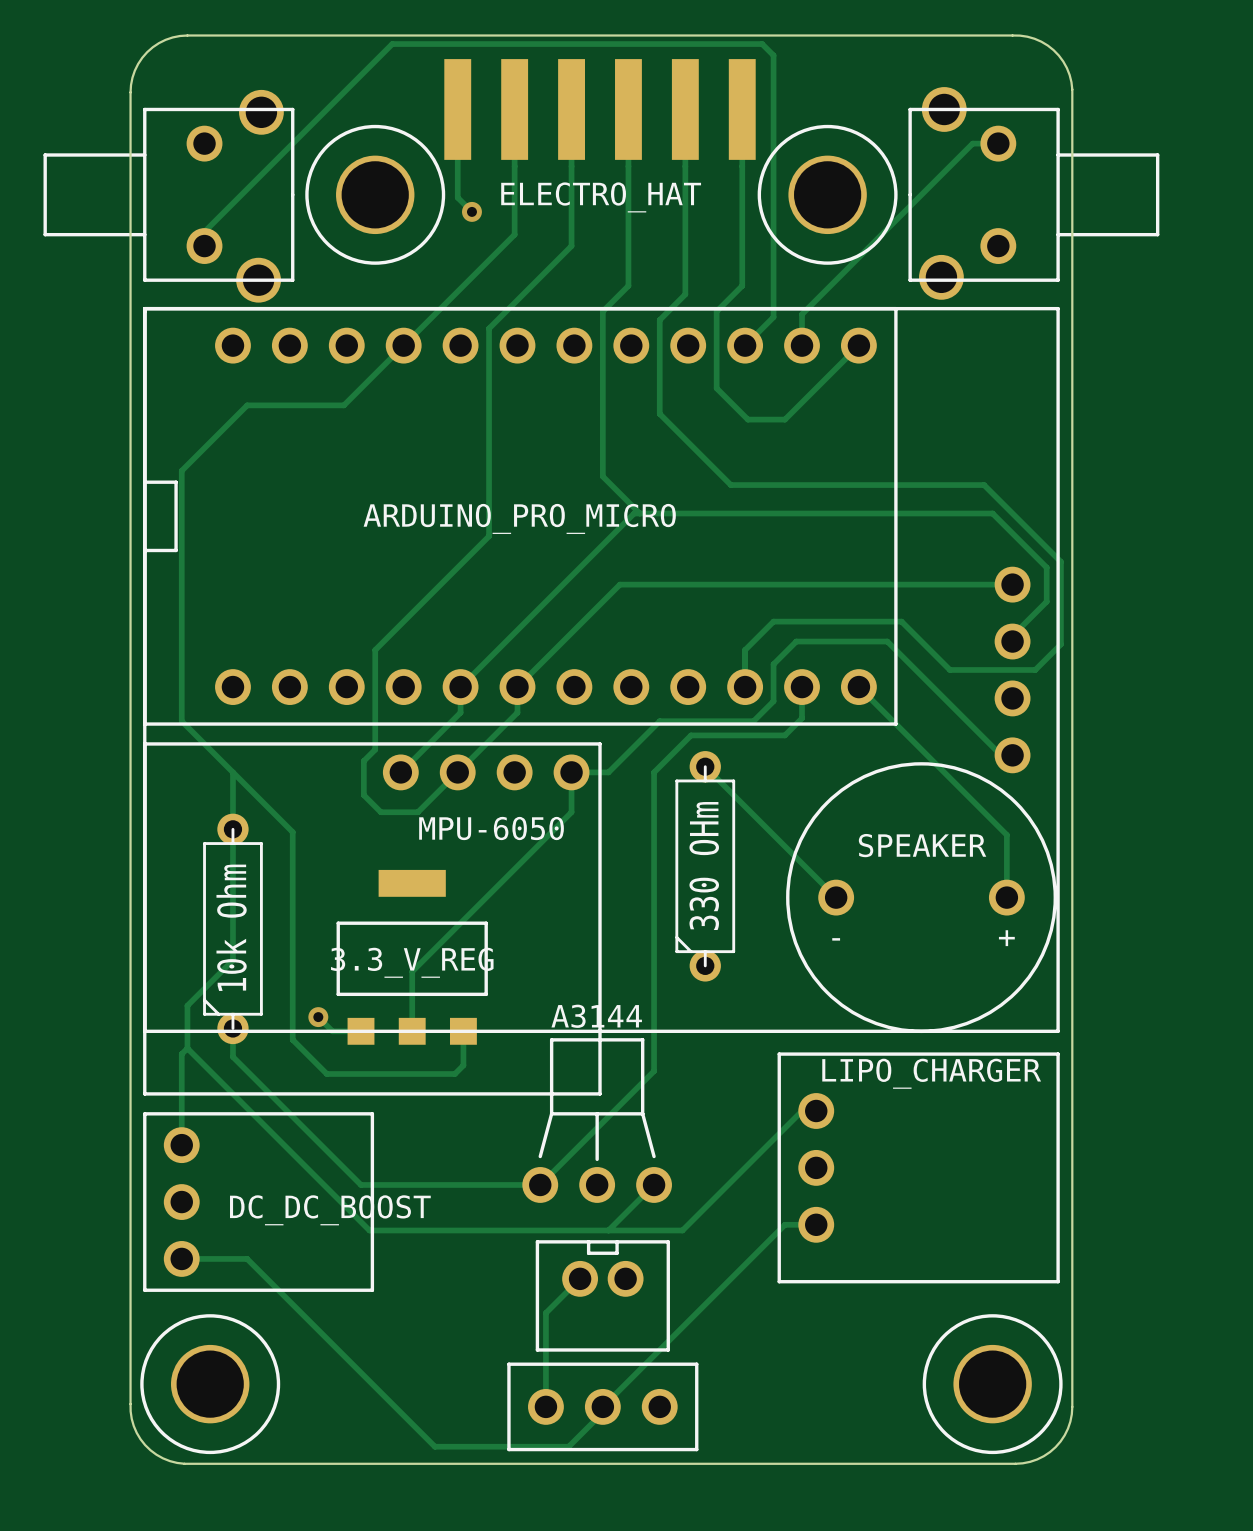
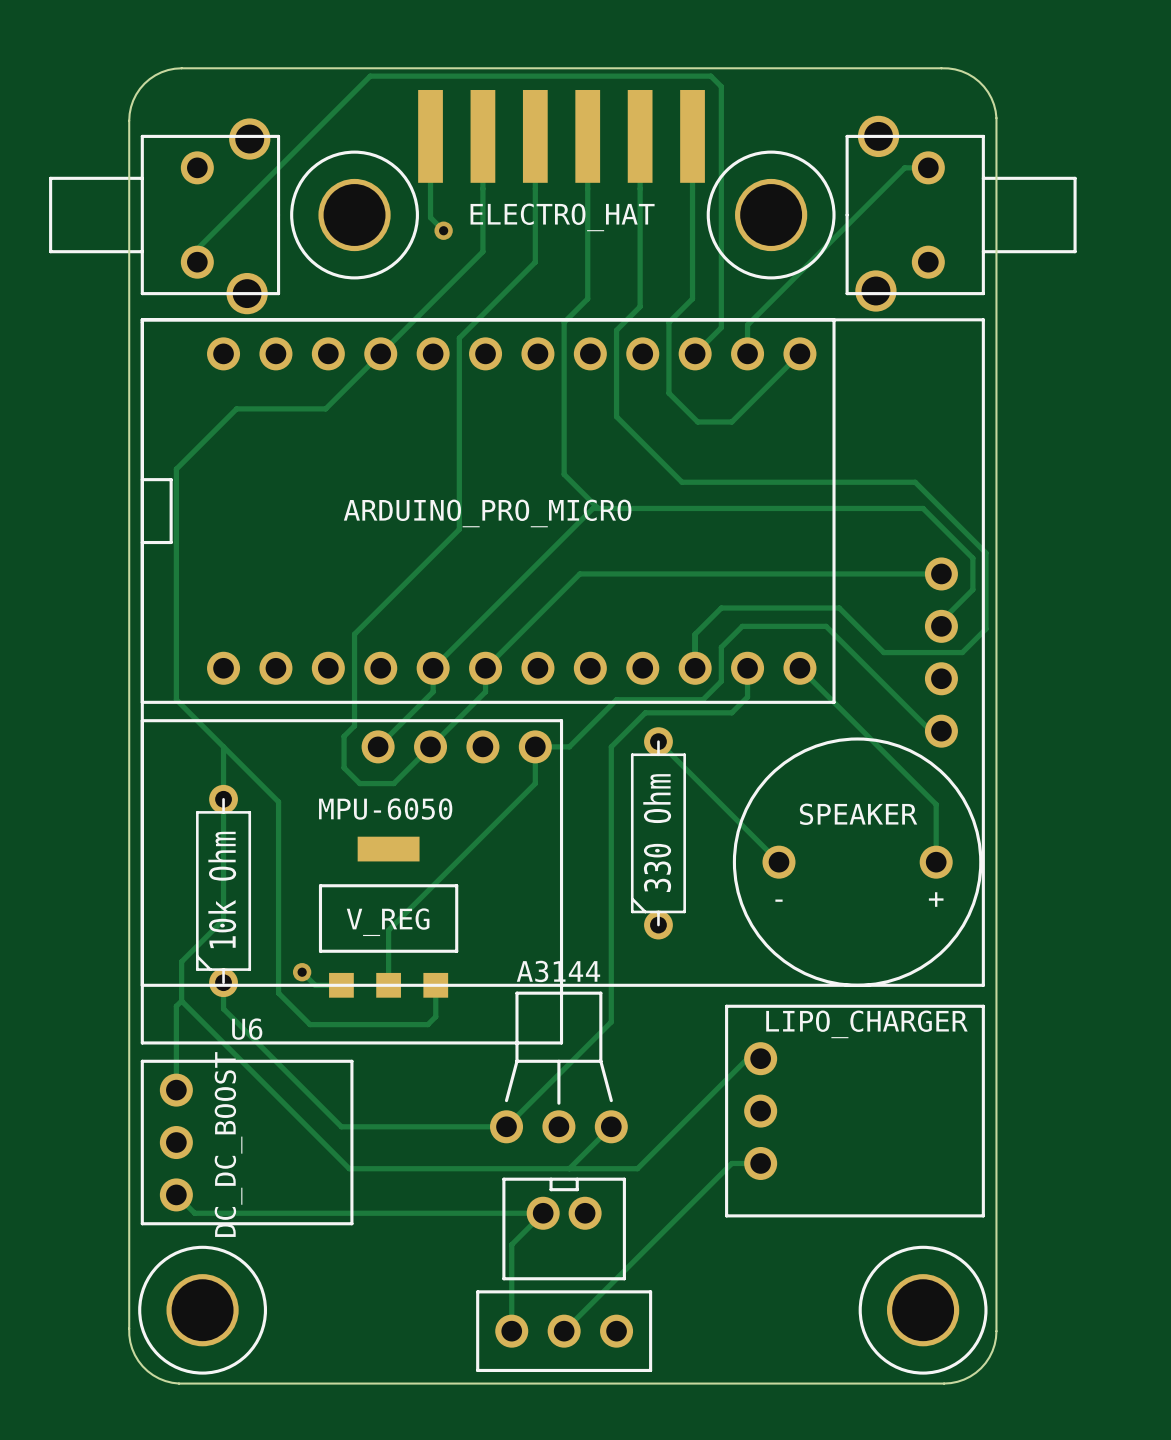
part value position: MPU-6050 (491, 828) -> MPU-6050 (385, 809)
330 OHm name: 330 OHm (704, 866) -> 330 Ohm (657, 833)
part value: 3.3_V_REG (412, 962) -> V_REG (388, 922)
U6 name: none -> U6 (247, 1029)
U6 value rotation: 0° (330, 1210) -> 90° counterclockwise (228, 1144)
track: (181, 1258) (247, 1258) (434, 1446) (568, 1446) (602, 1412) (602, 1406) -> (176, 1194) (194, 1213) (543, 1213)

